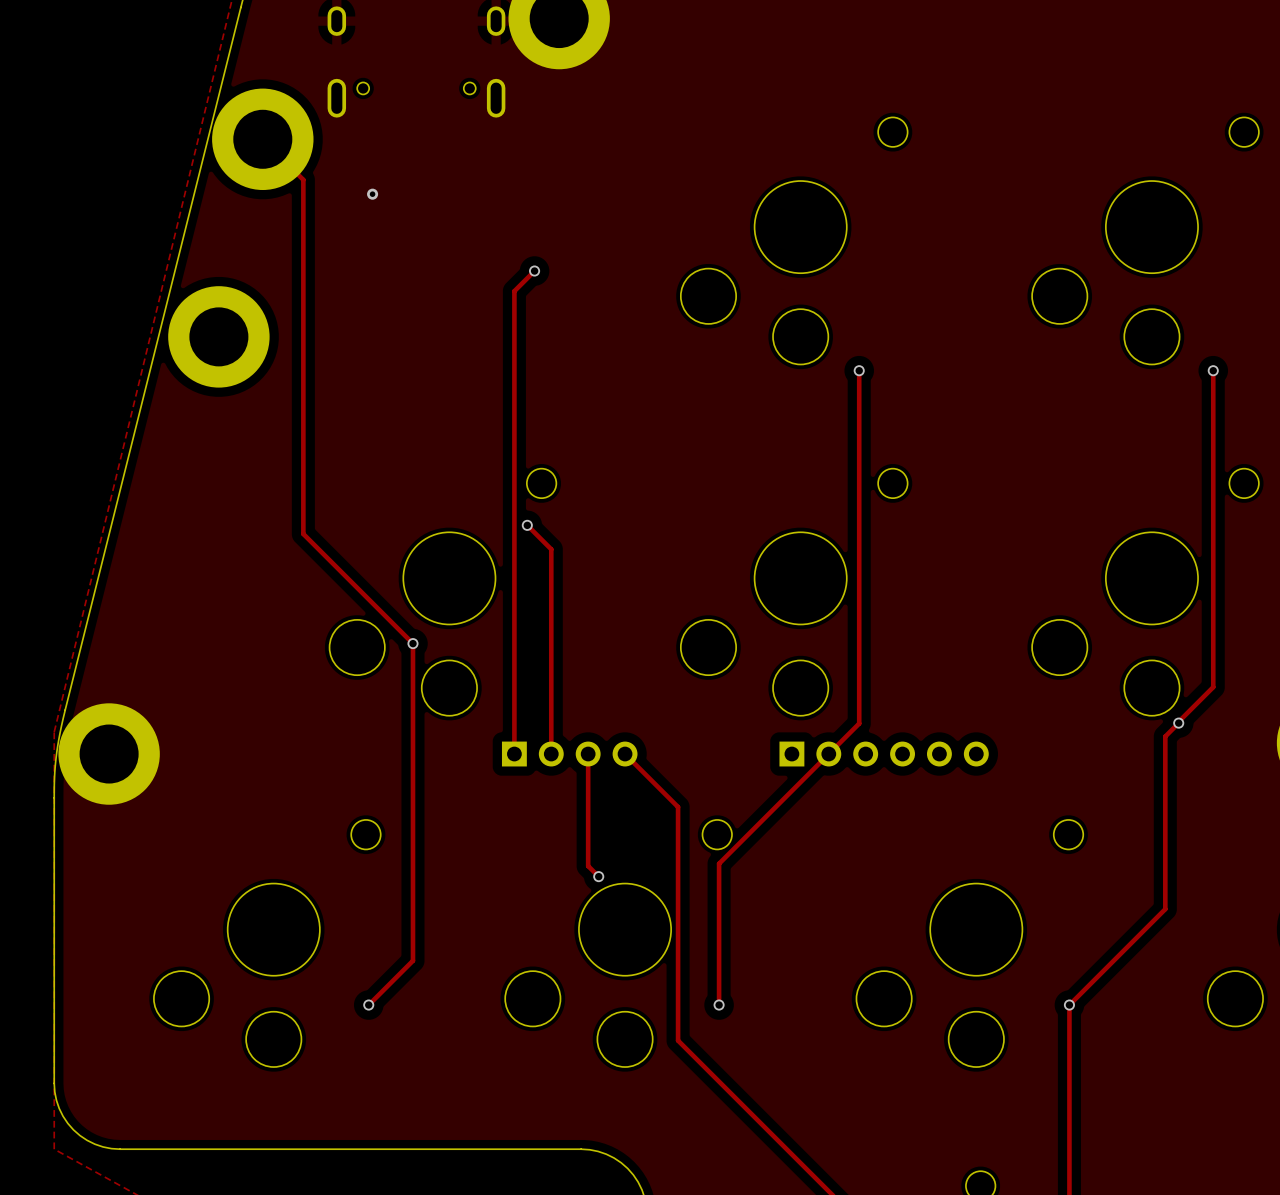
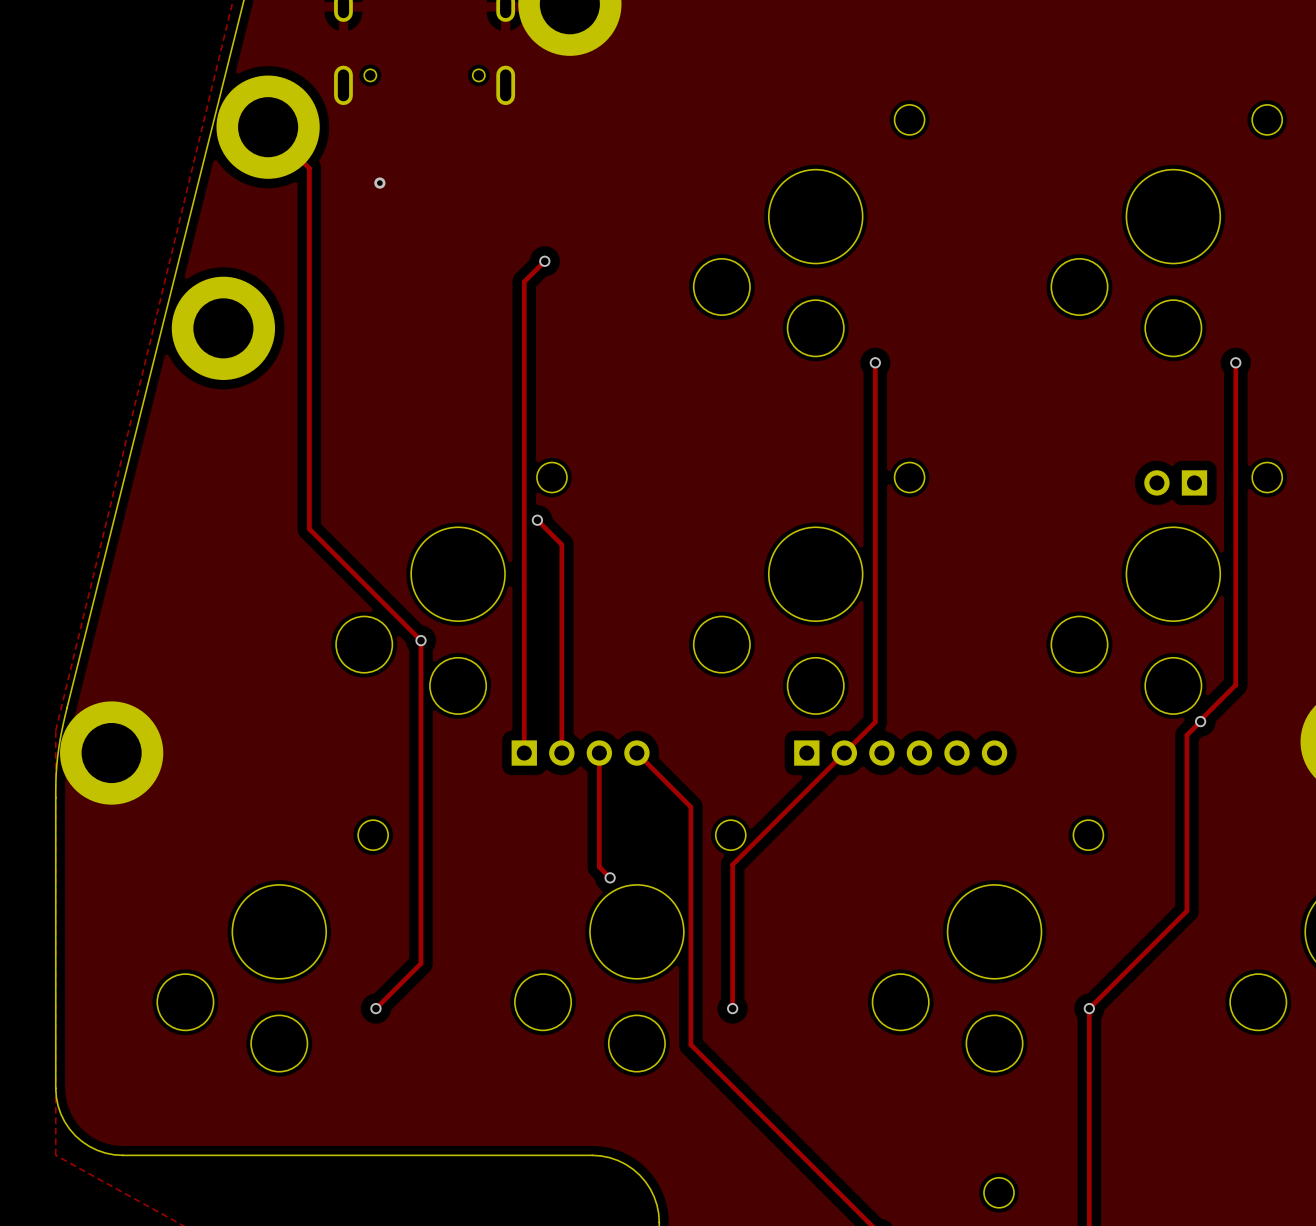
part: none -> (1175, 482)

